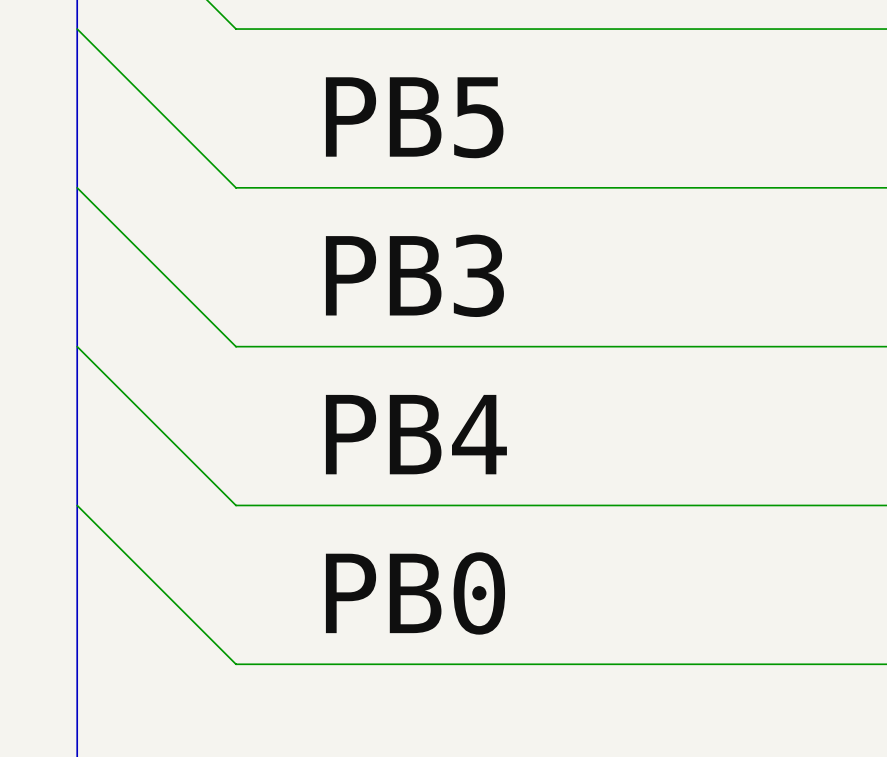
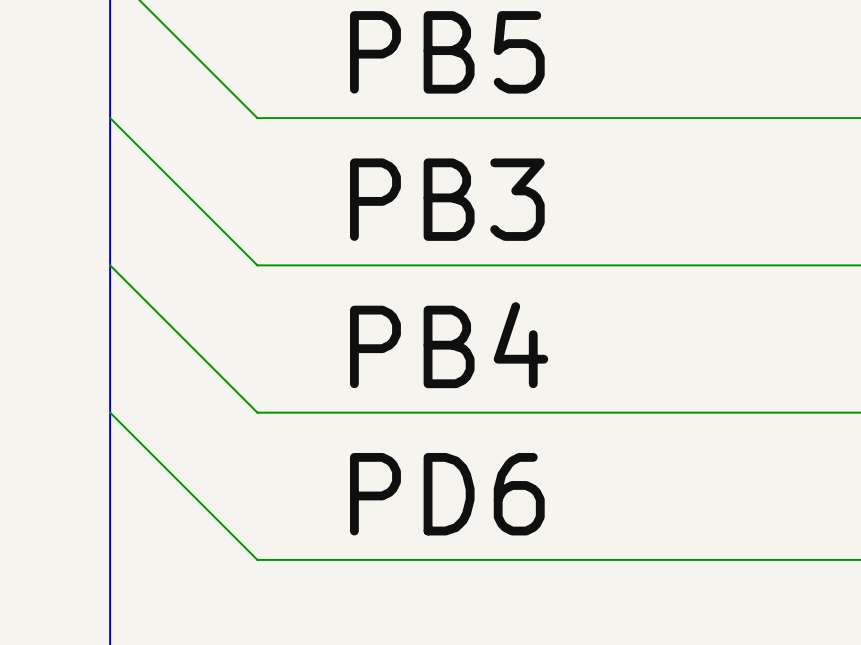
label: PB0 (415, 593) -> PD6 (447, 494)

